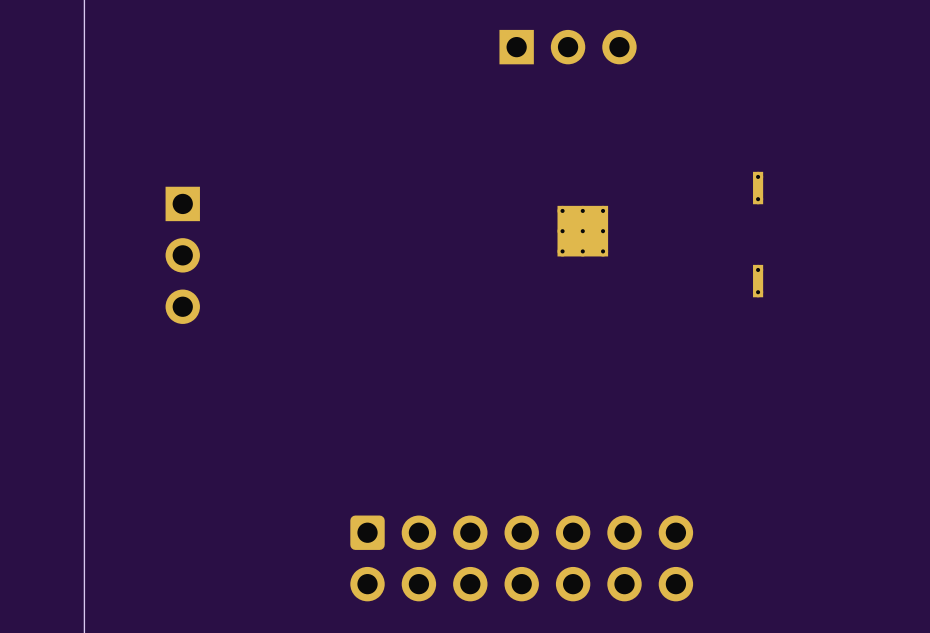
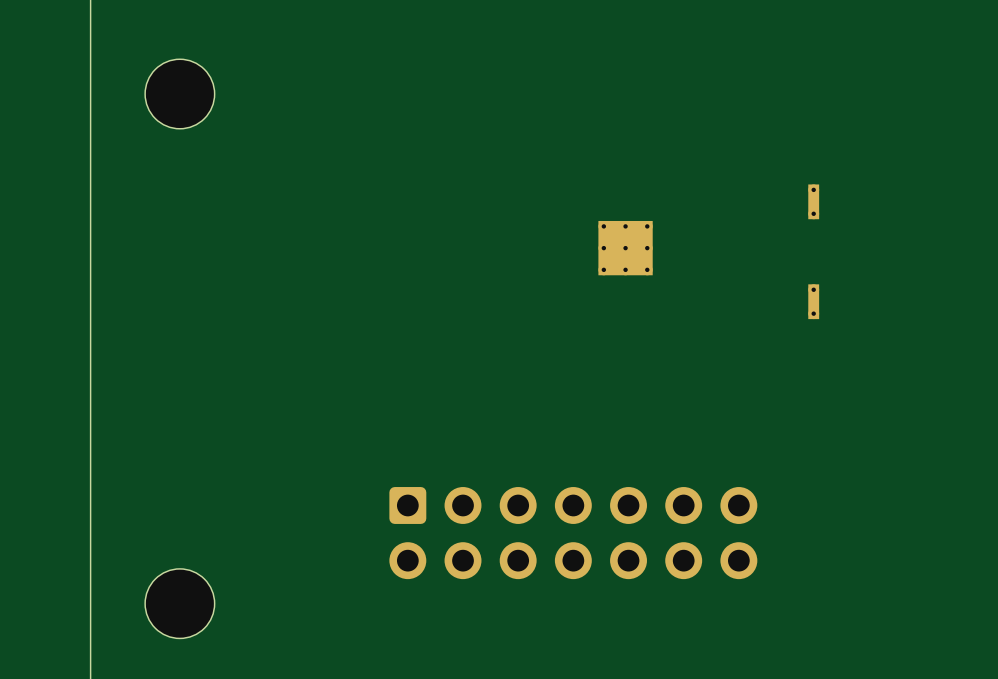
part: (568, 47) -> none
part: none -> (179, 94)
part: (182, 255) -> none
part position: (521, 558) -> (573, 533)
part: none -> (179, 603)

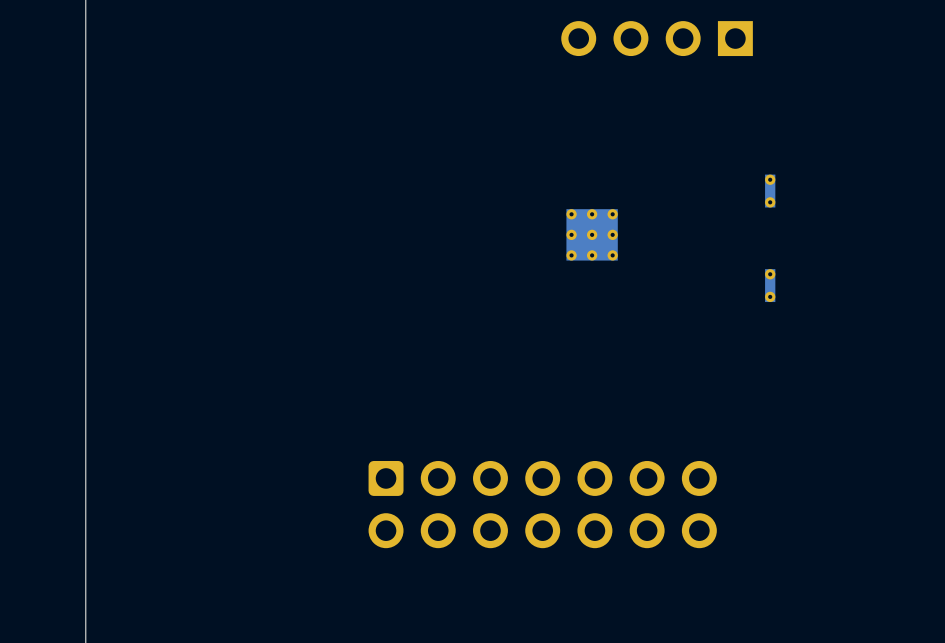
part: none -> (657, 38)
part: (179, 94) -> none
part: (179, 603) -> none

